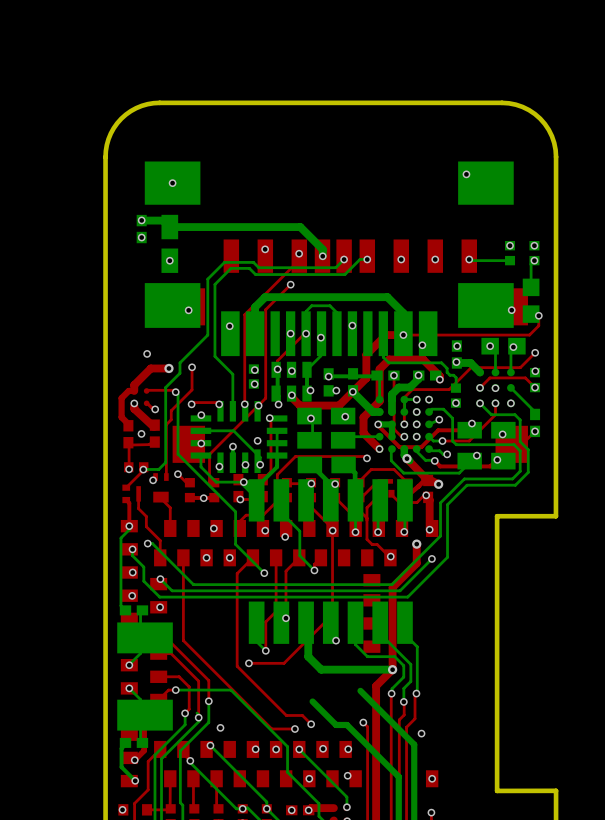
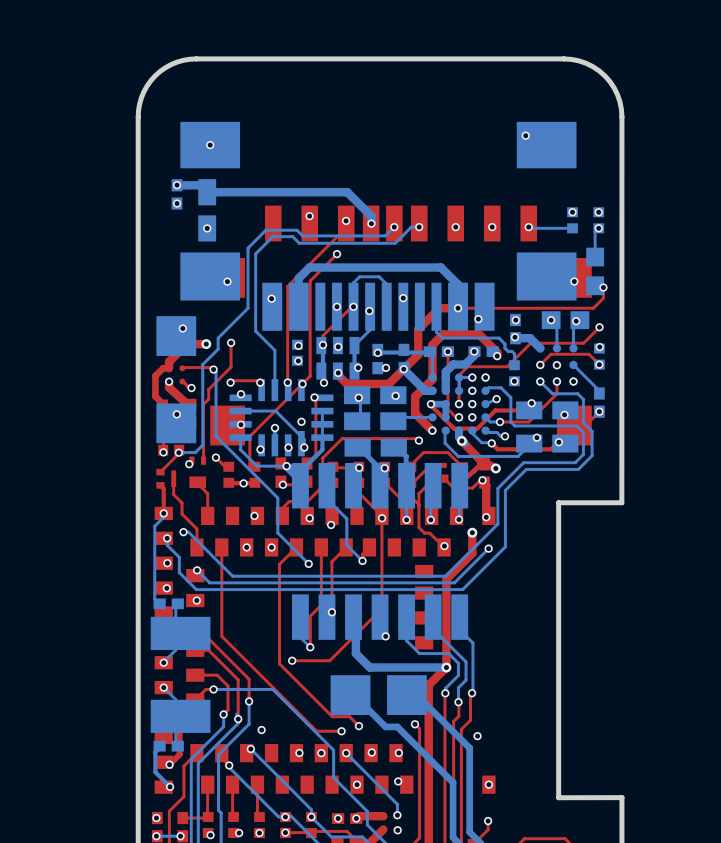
part: none -> (176, 336)
part: none -> (176, 423)
part: none -> (350, 695)
part: none -> (406, 695)

